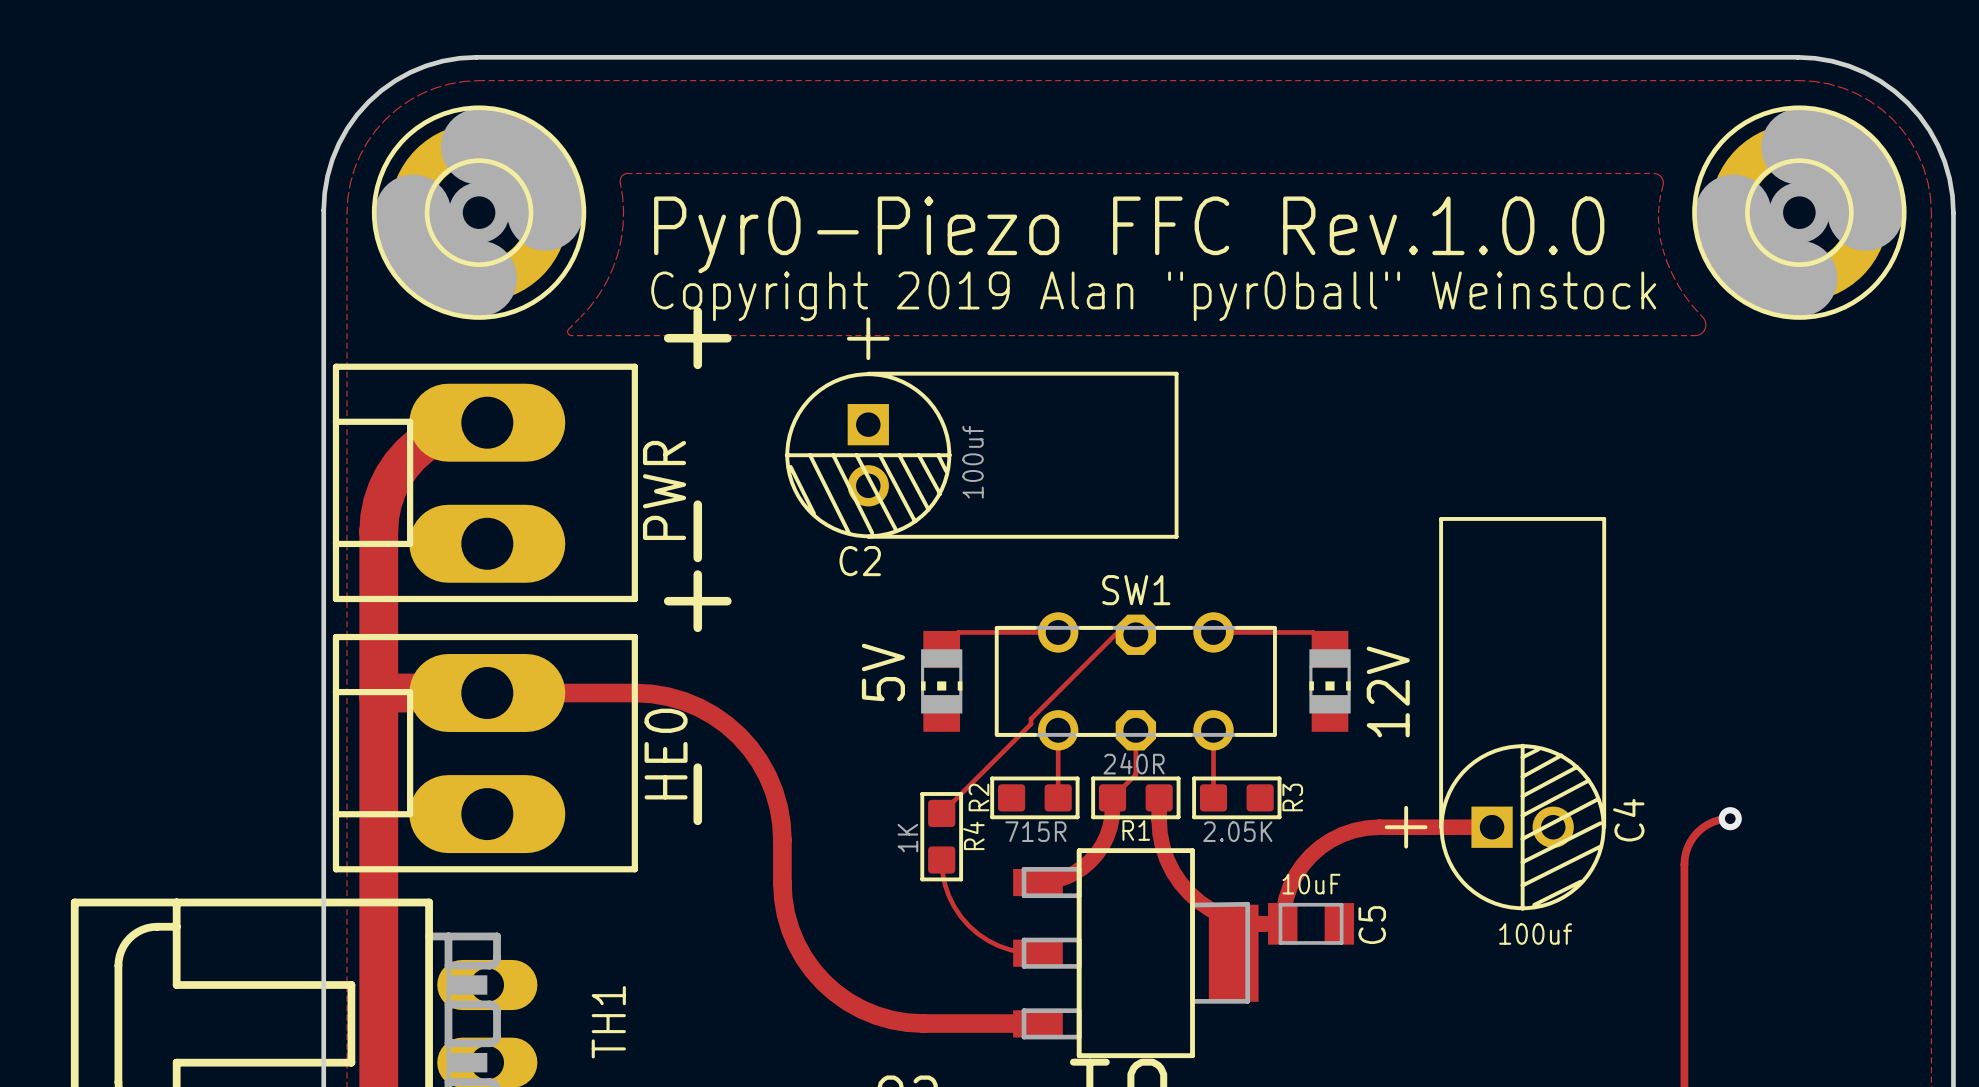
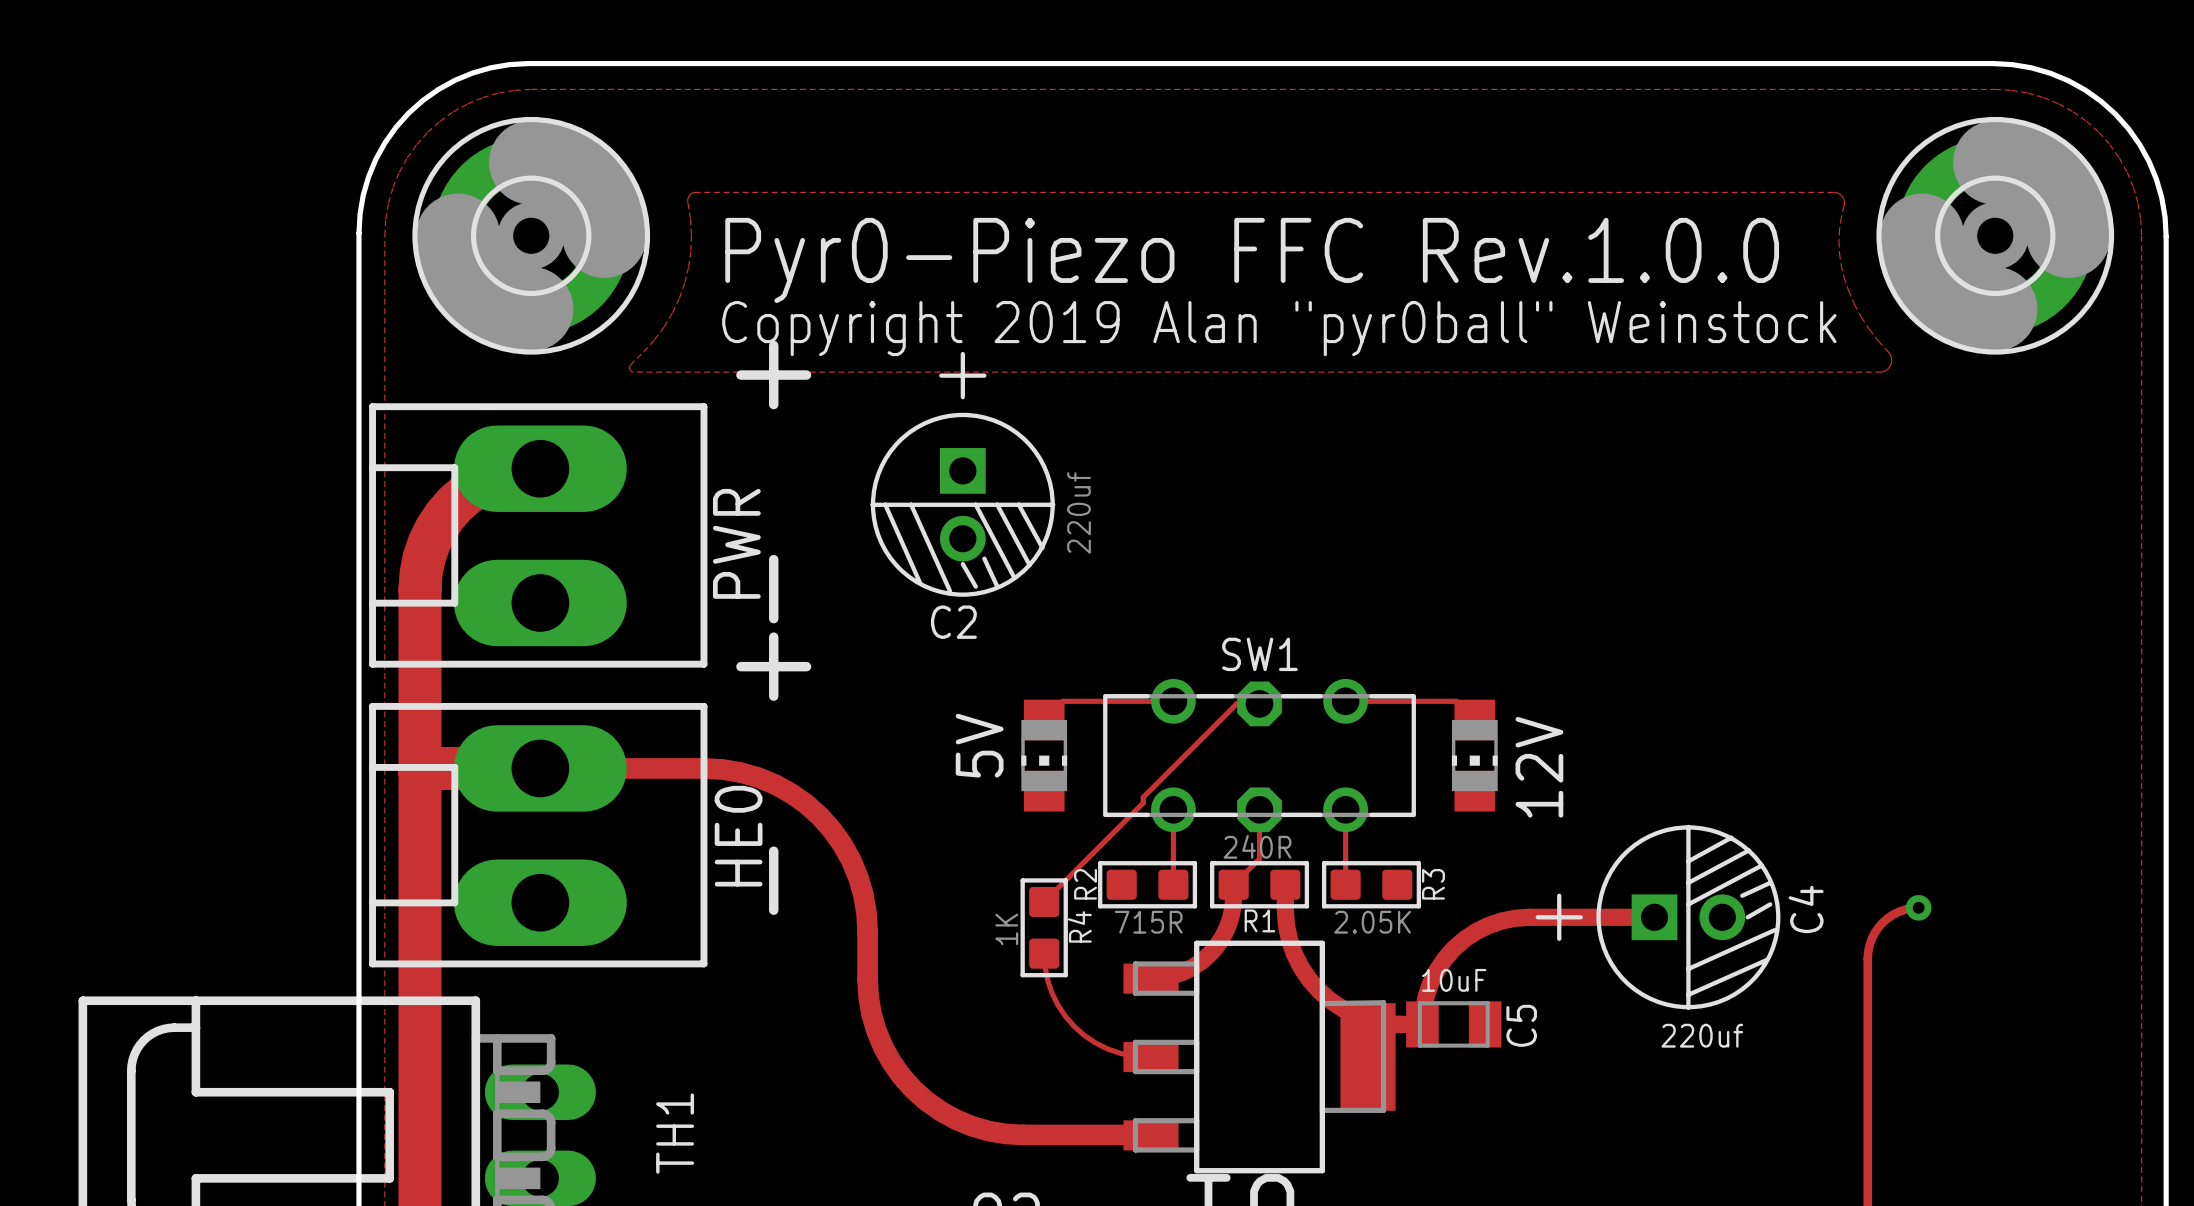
C2 footprint: [784, 317, 1179, 539] -> [870, 351, 1056, 597]
C2 value: 100uf (973, 462) -> 220uf (1079, 513)
C4 footprint: [1384, 517, 1607, 911] -> [1535, 824, 1781, 1010]
C4 value: 100uf (1535, 934) -> 220uf (1702, 1035)

